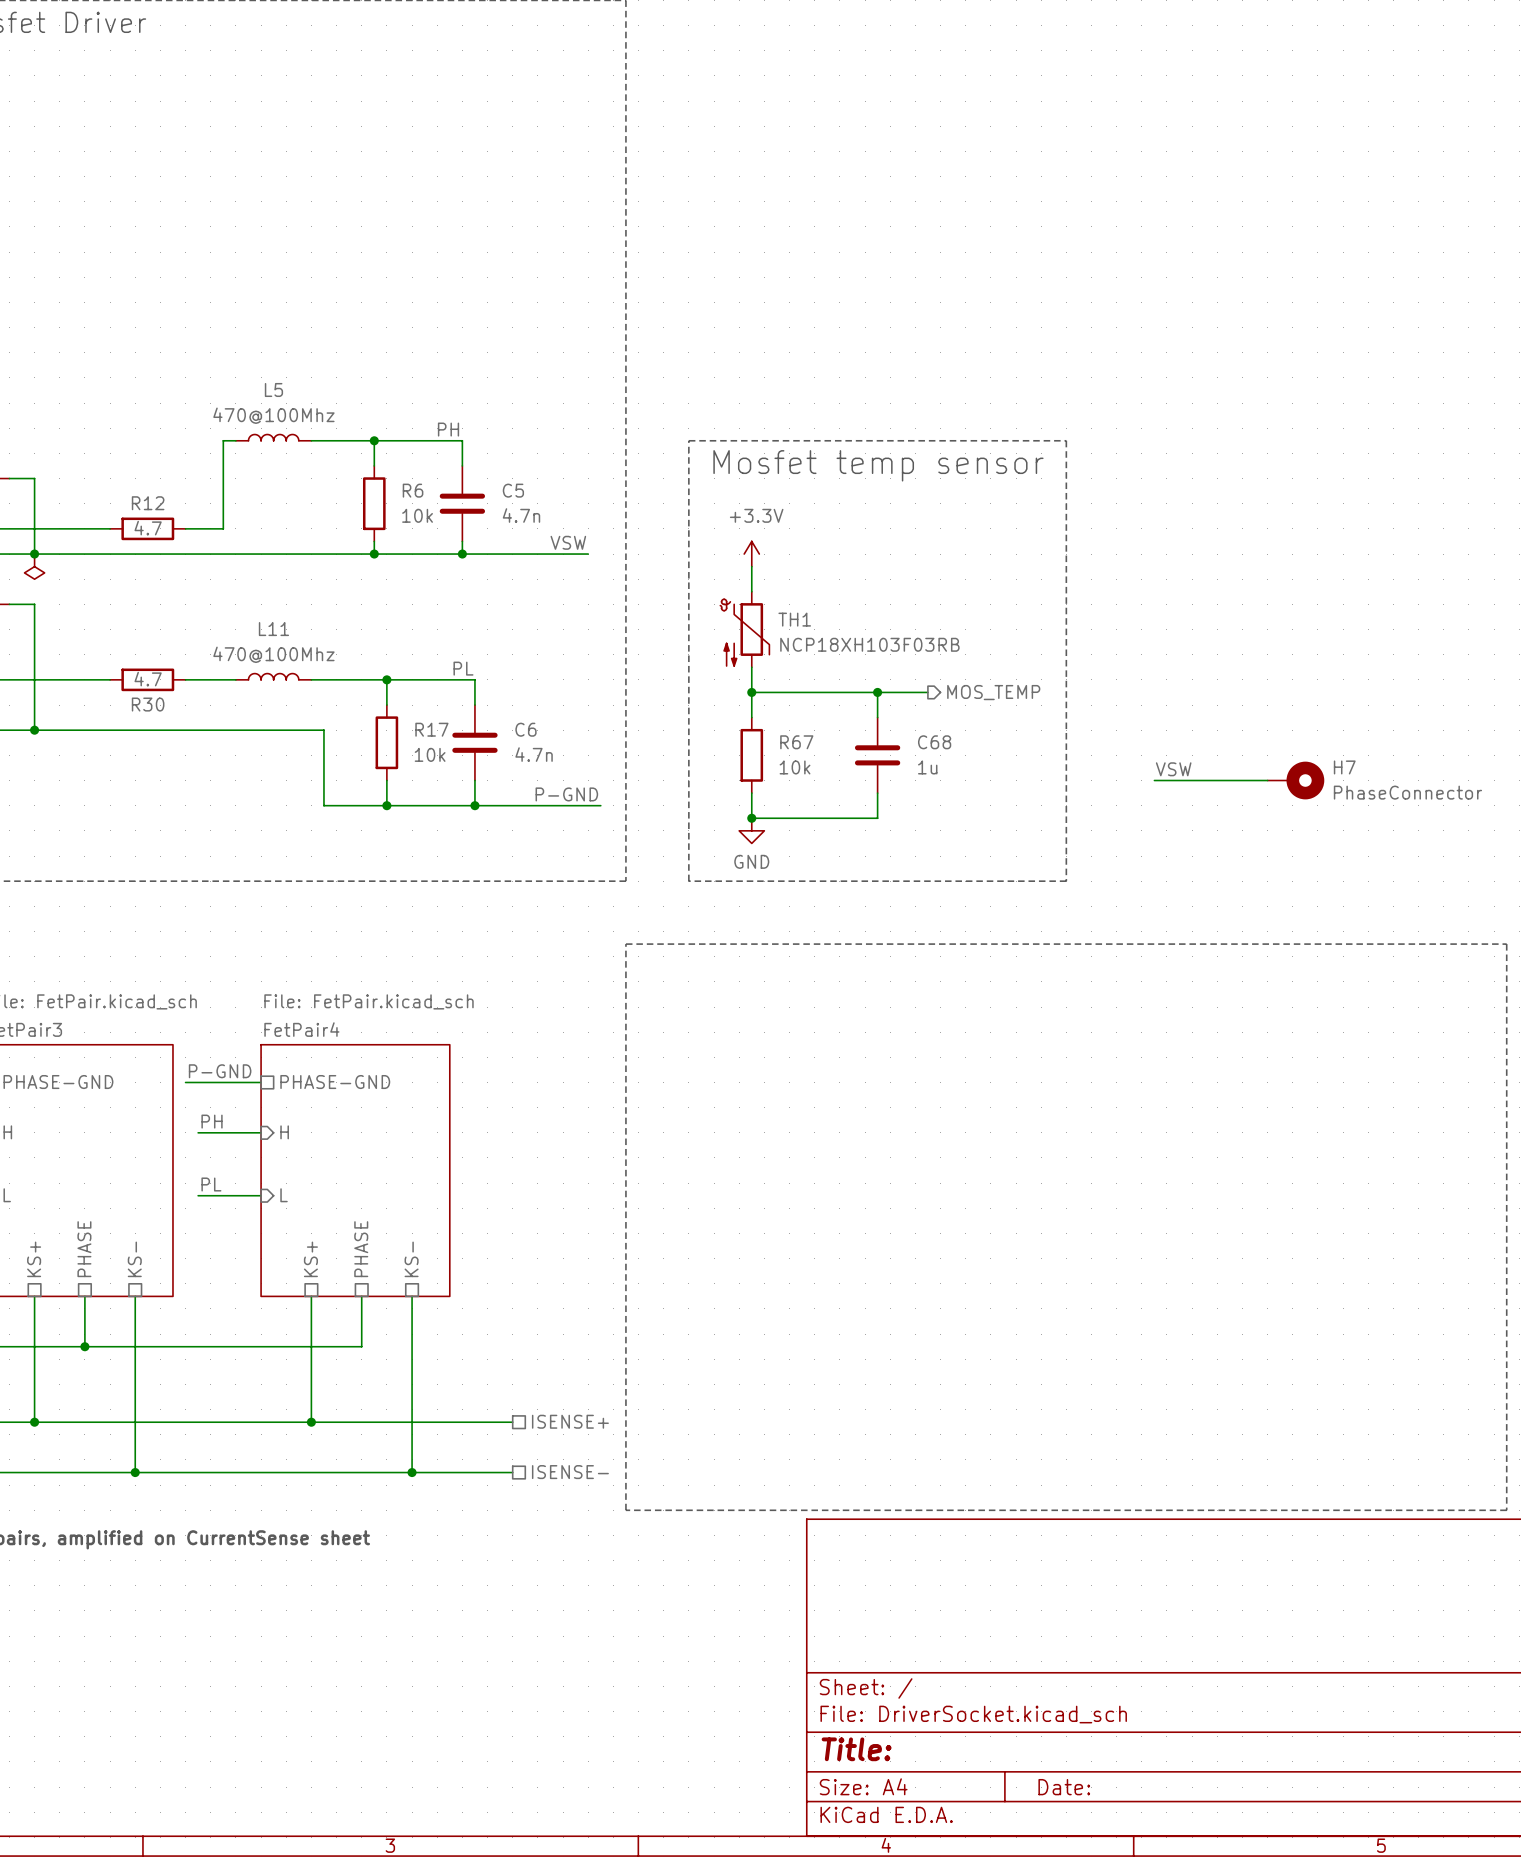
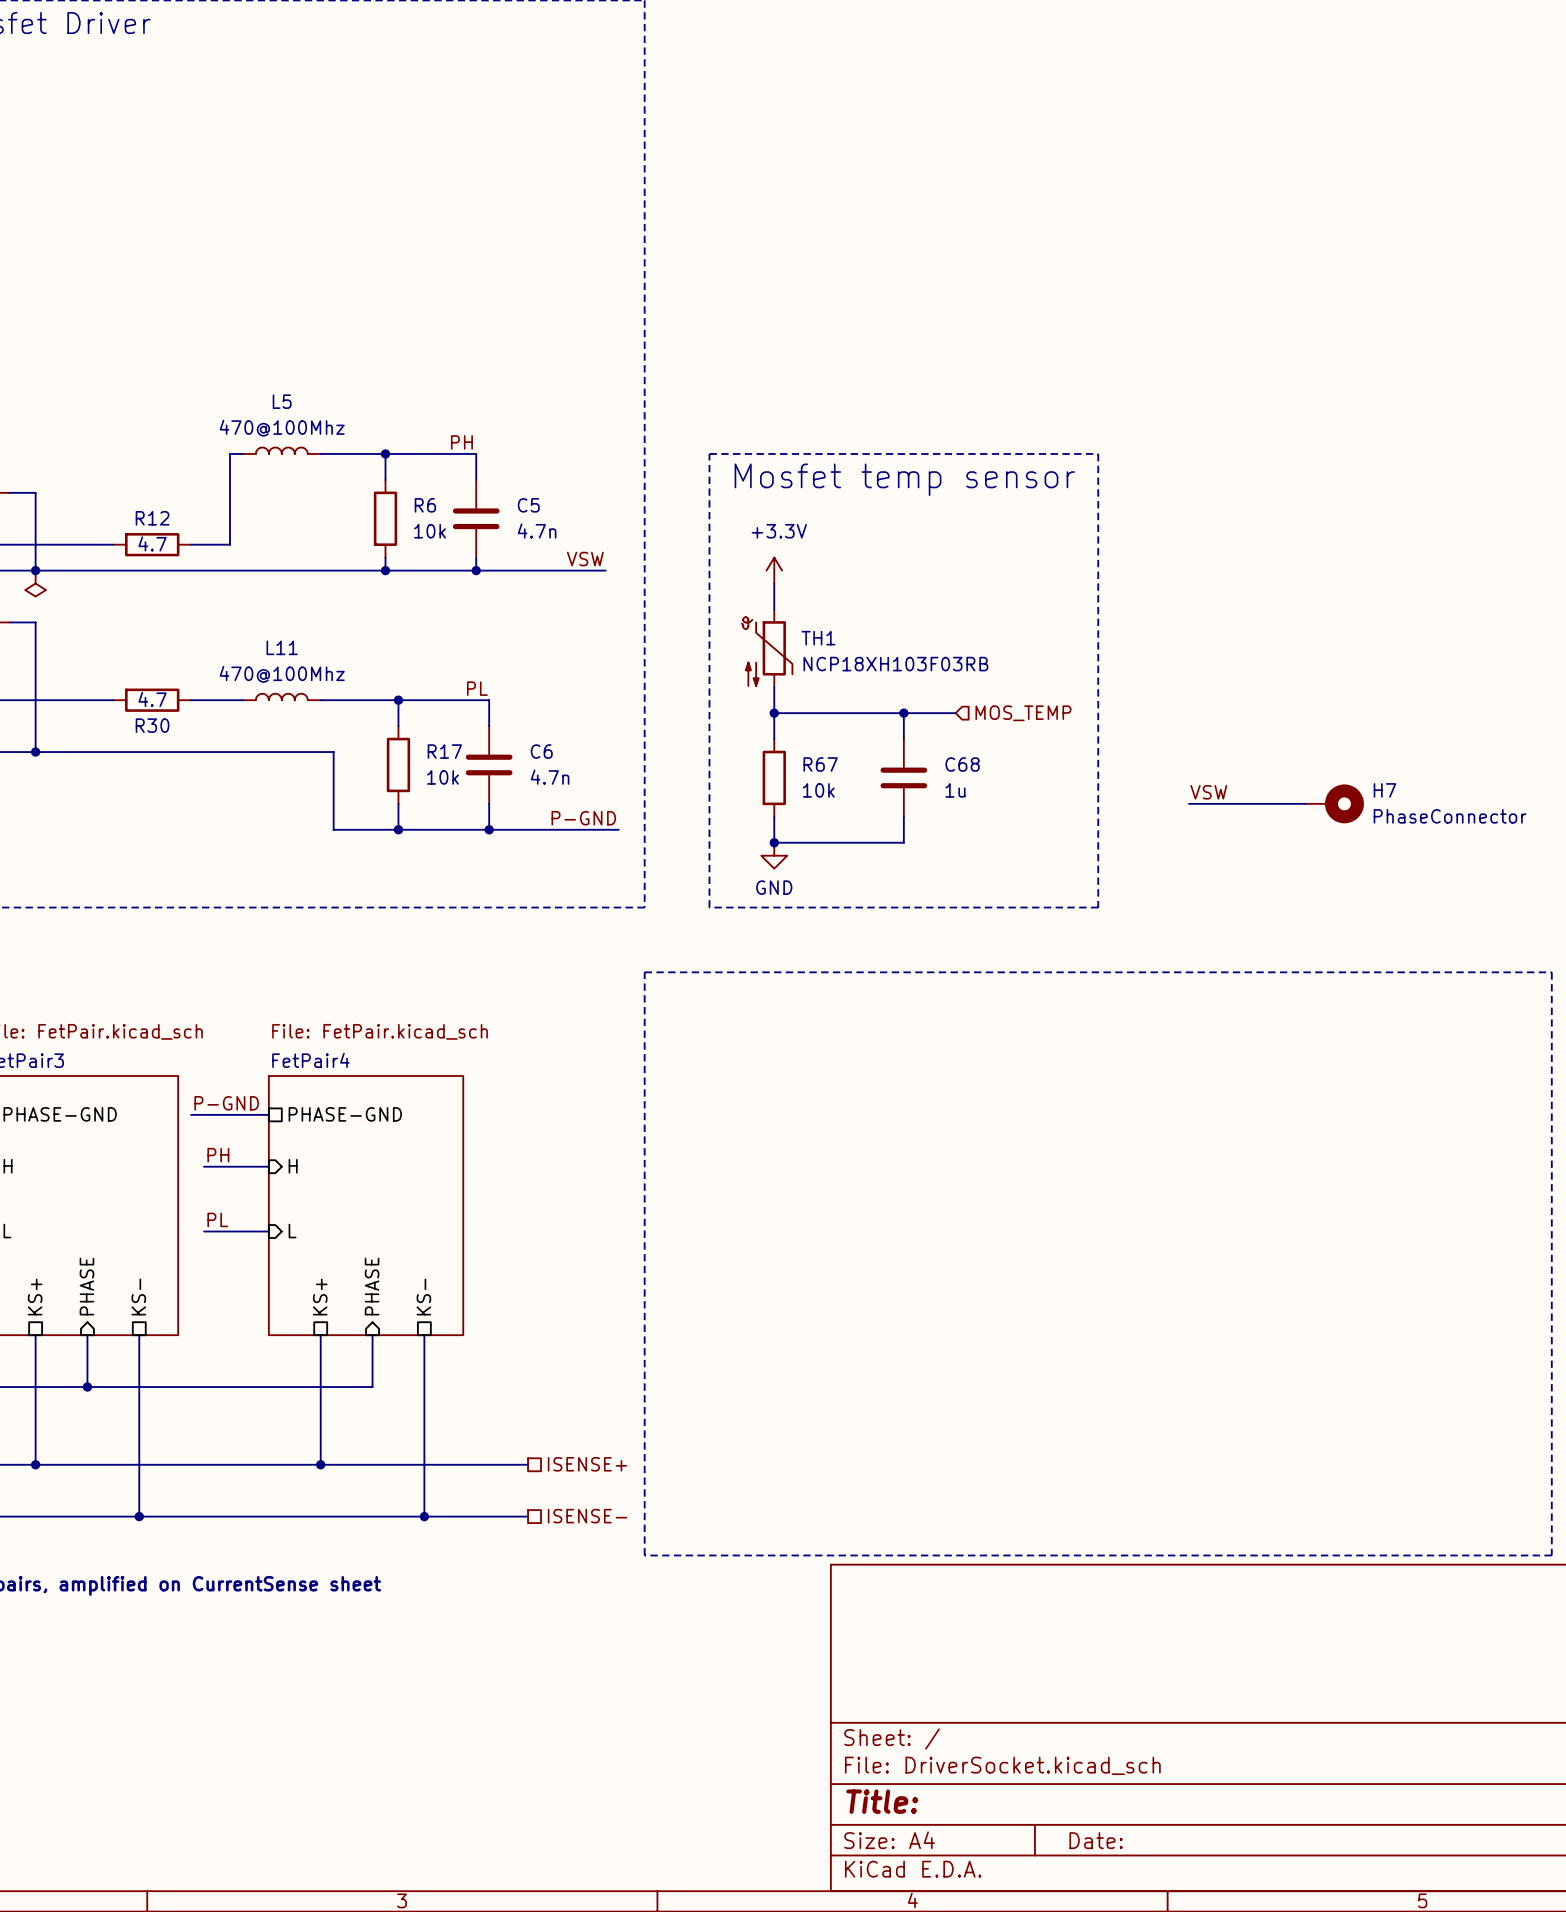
hierarchical label shape: output (993, 692) -> input (1023, 713)
sheet pin shape: passive (84, 1249) -> input (86, 1286)
sheet pin shape: passive (361, 1249) -> input (372, 1286)

